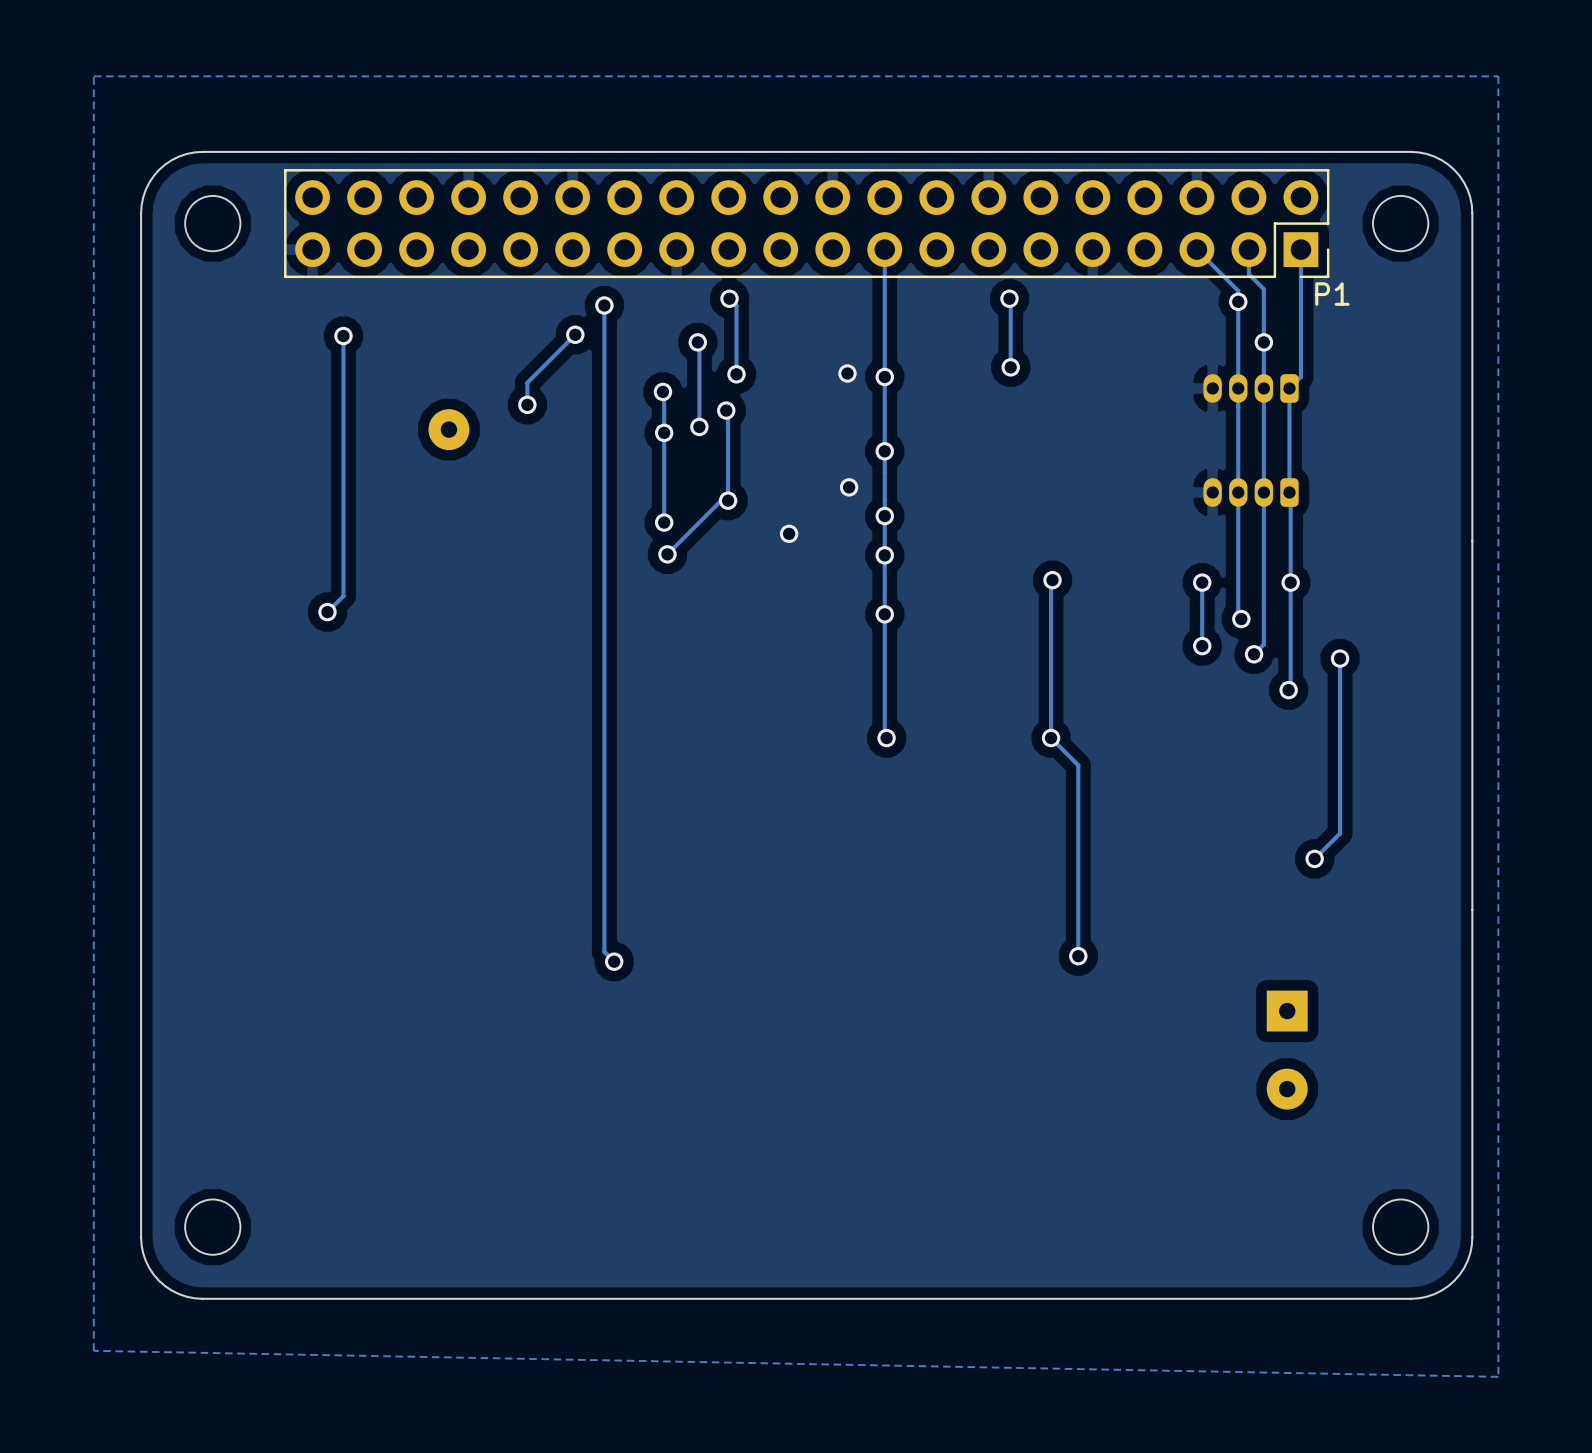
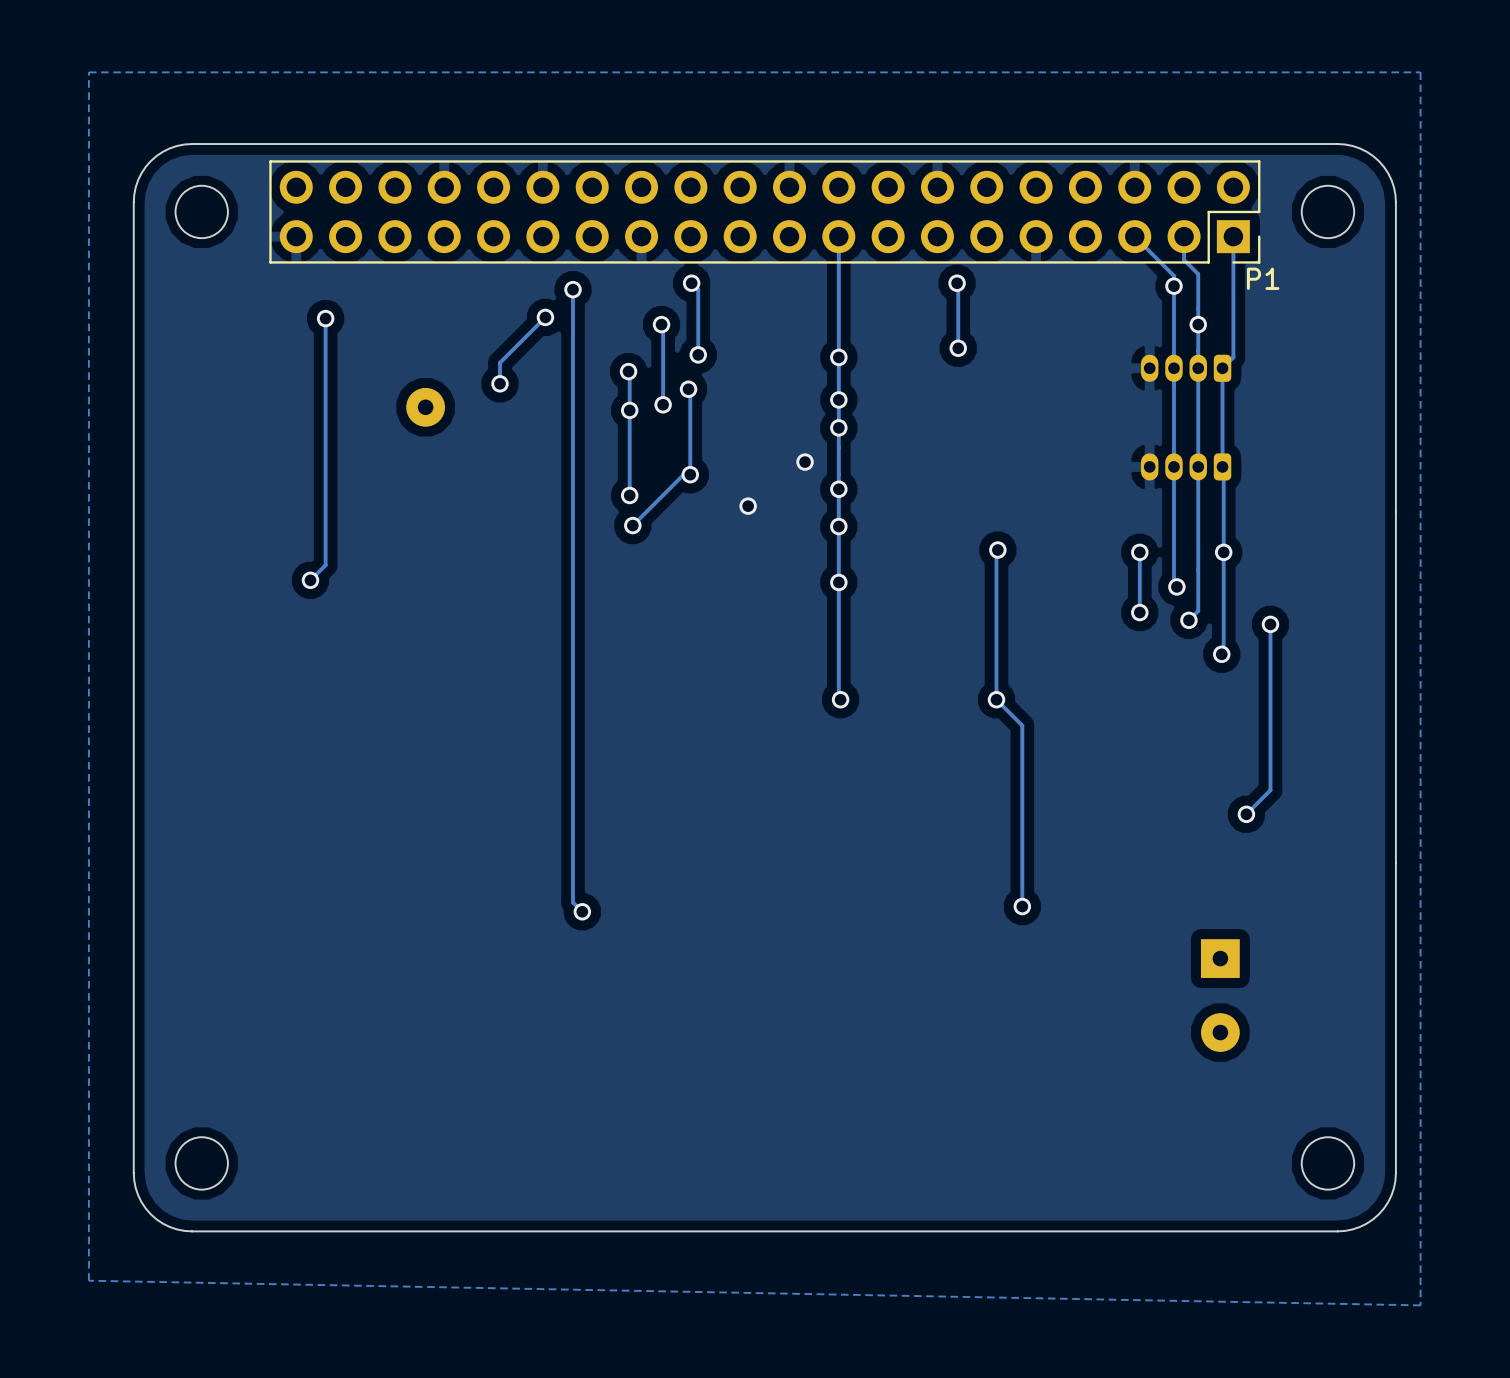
via position: (847, 373) -> (838, 399)

